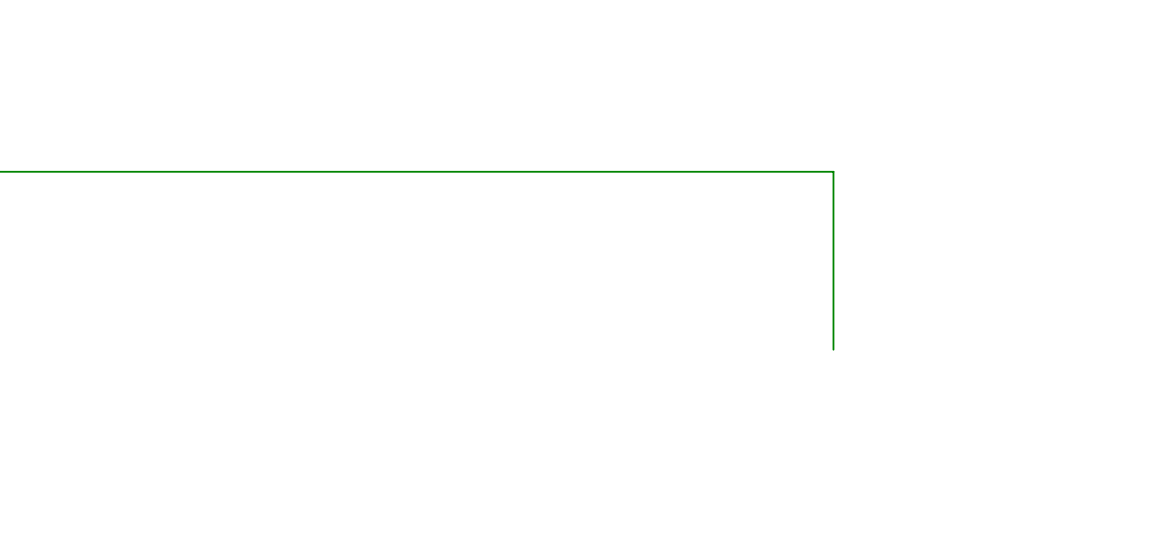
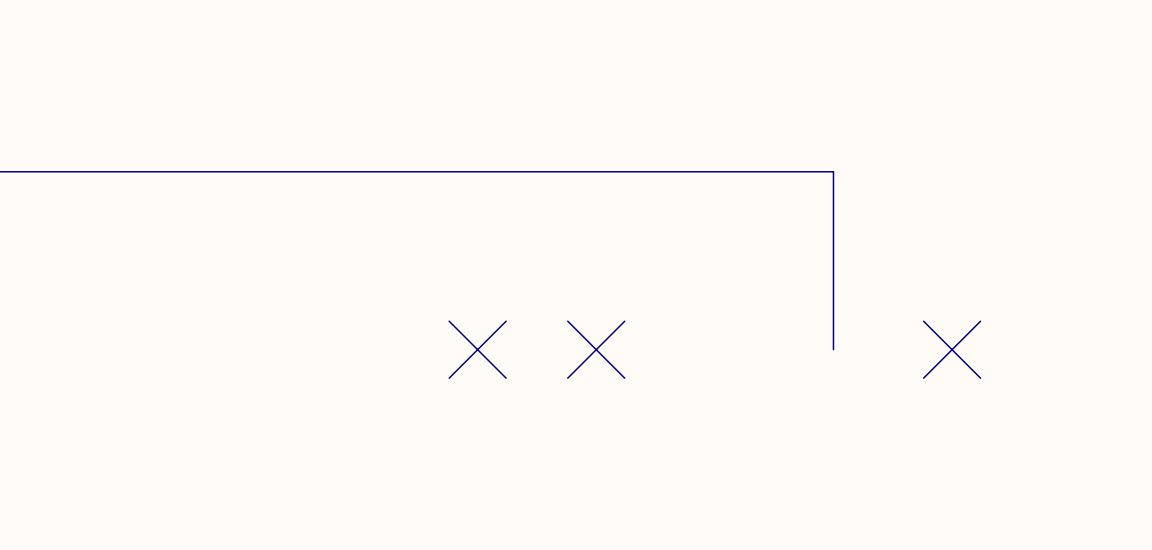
no-connect mark: none -> (477, 349)
no-connect mark: none -> (596, 349)
no-connect mark: none -> (952, 349)

